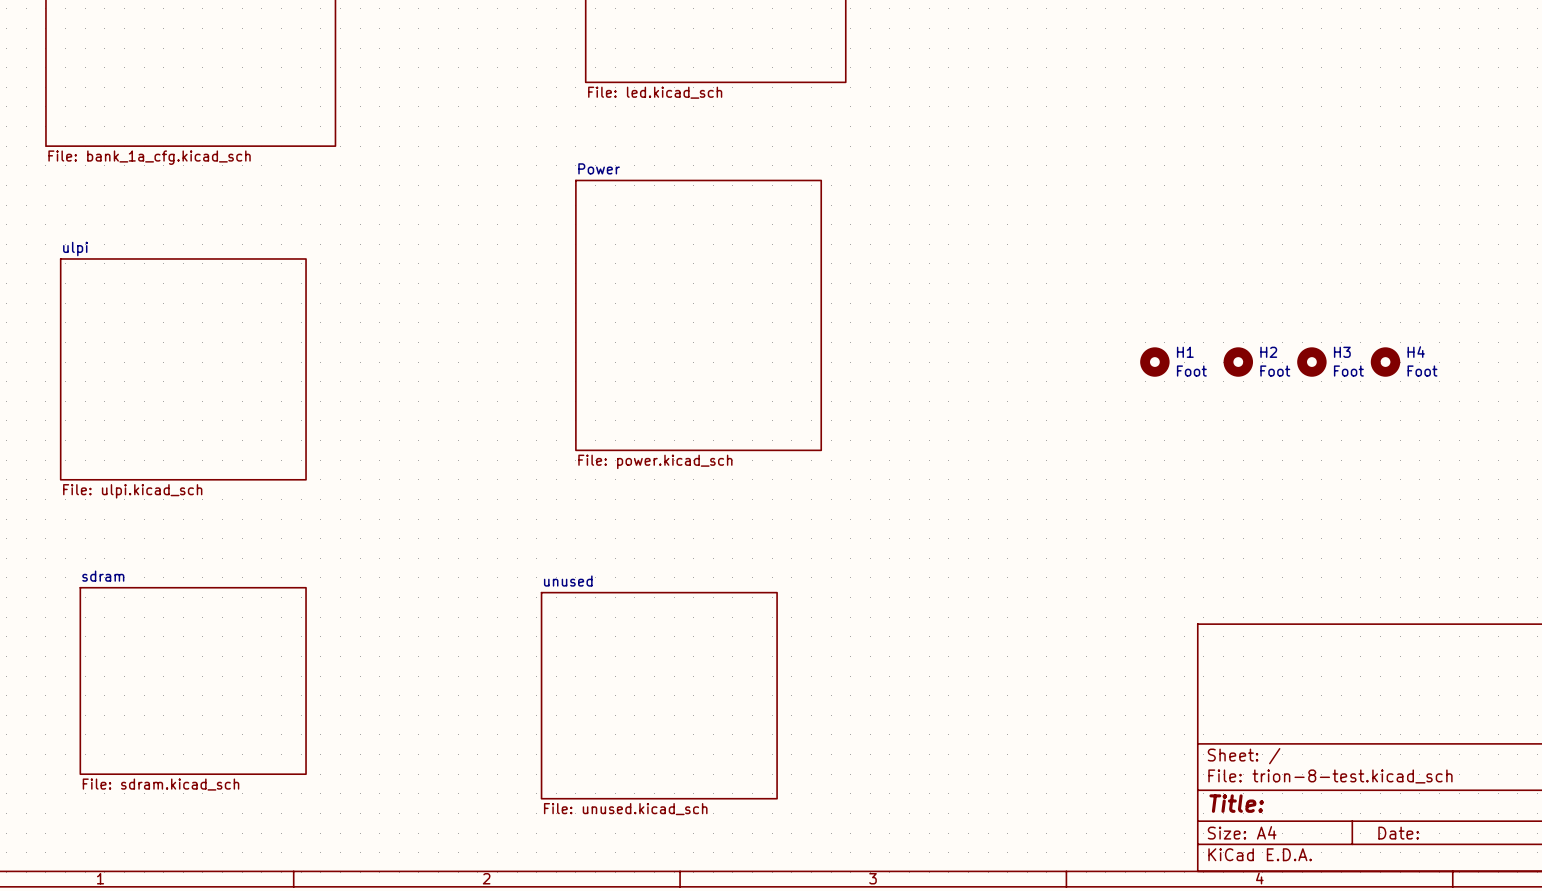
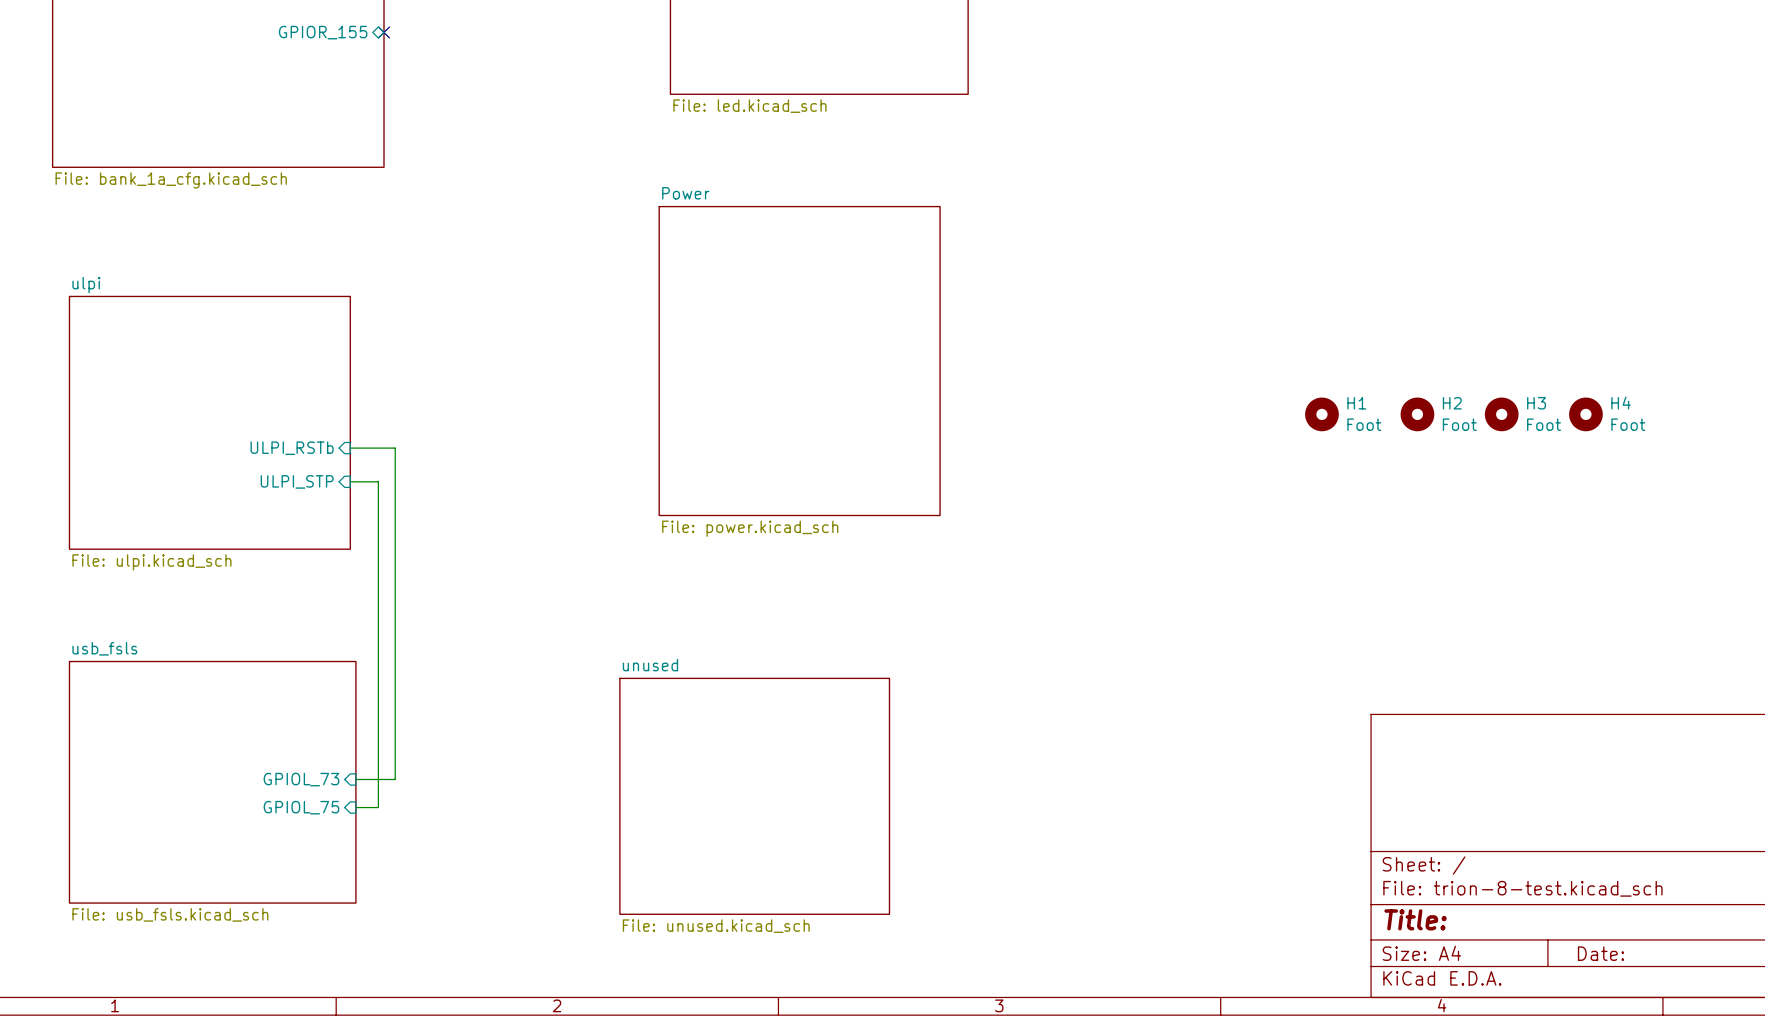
sheet pin: none -> GPIOR_155 (323, 32)
no-connect mark: none -> (384, 32)
sheet pin: none -> ULPI_RSTb (292, 448)
wire: none -> (350, 448) (395, 448) (395, 779) (355, 779)
wire: none -> (350, 481) (378, 481) (378, 807) (355, 807)
sheet pin: none -> ULPI_STP (297, 481)
sheet sdram: File: sdram.kicad_sch (193, 680) -> none
sheet pin: none -> GPIOL_73 (301, 779)
sheet usb_fsls: none -> File: usb_fsls.kicad_sch (212, 782)
sheet pin: none -> GPIOL_75 (301, 807)

